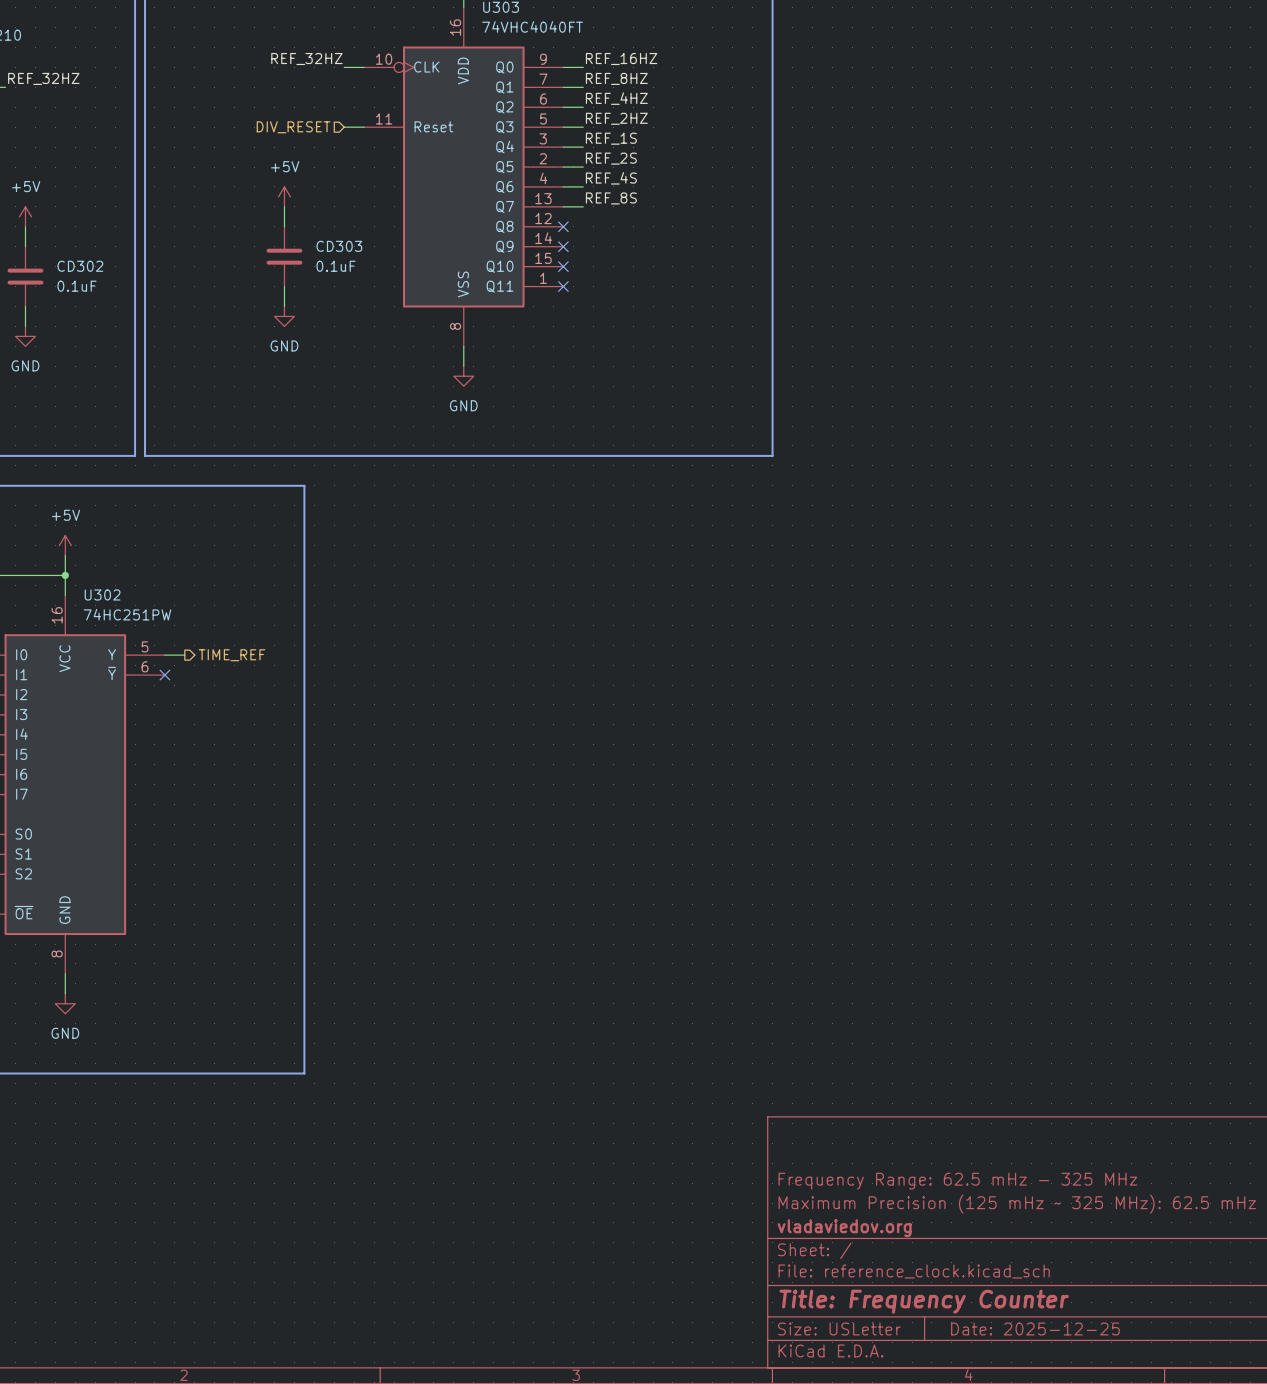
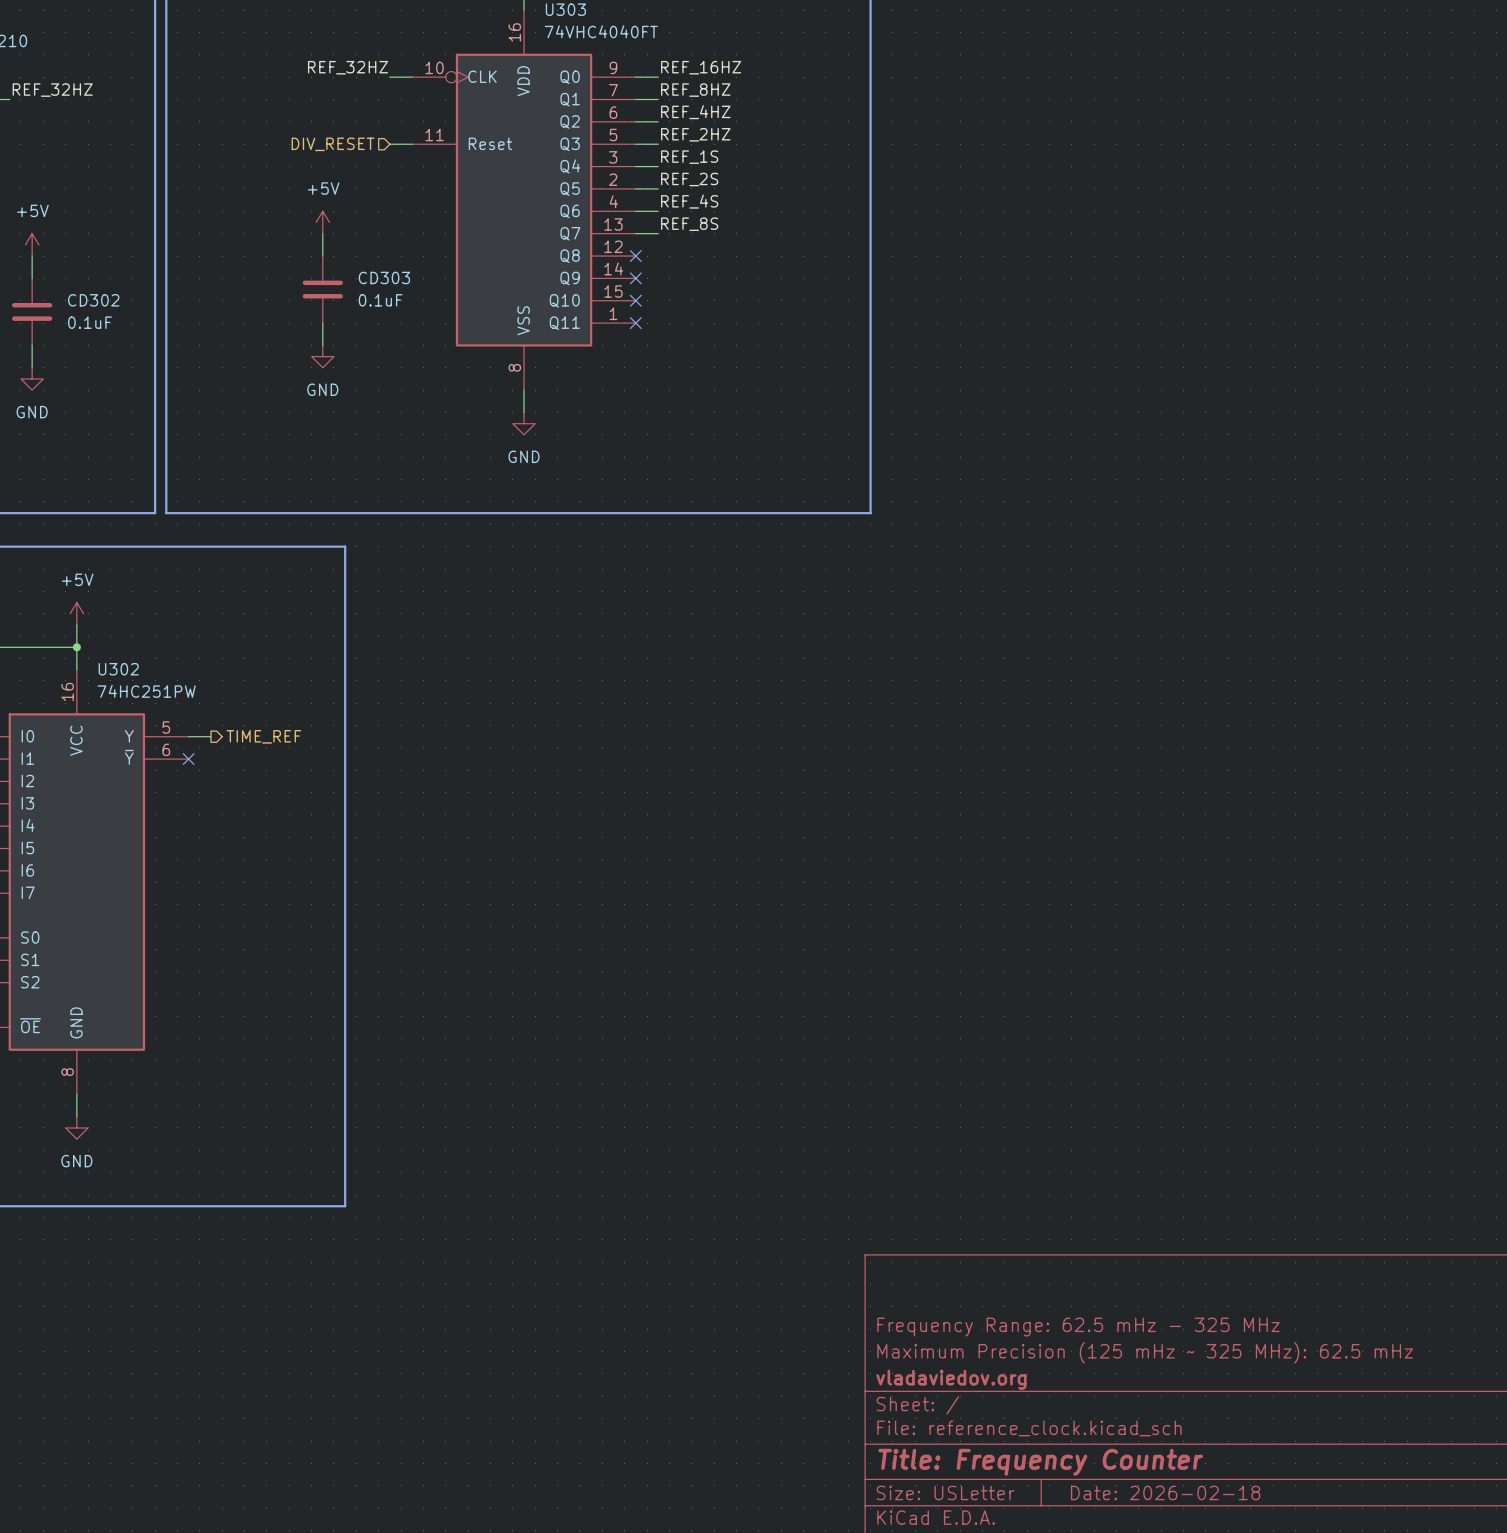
title block: Date: 2025-12-25 (1035, 1329) -> Date: 2026-02-18 (1165, 1492)

